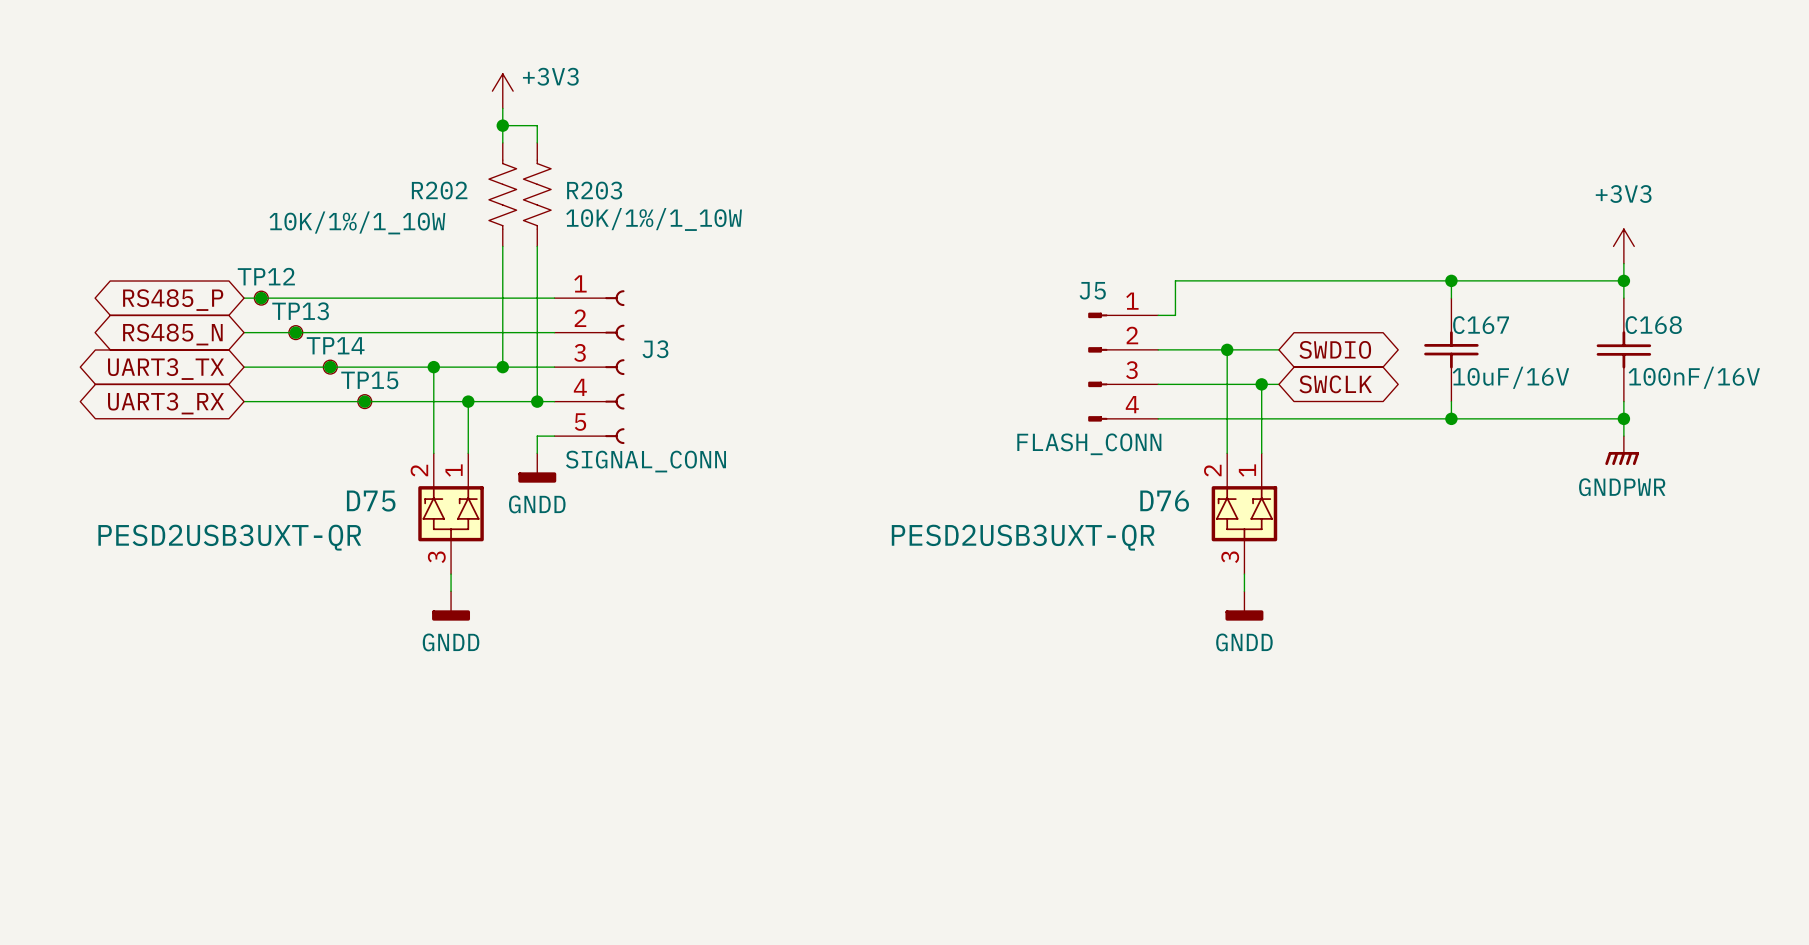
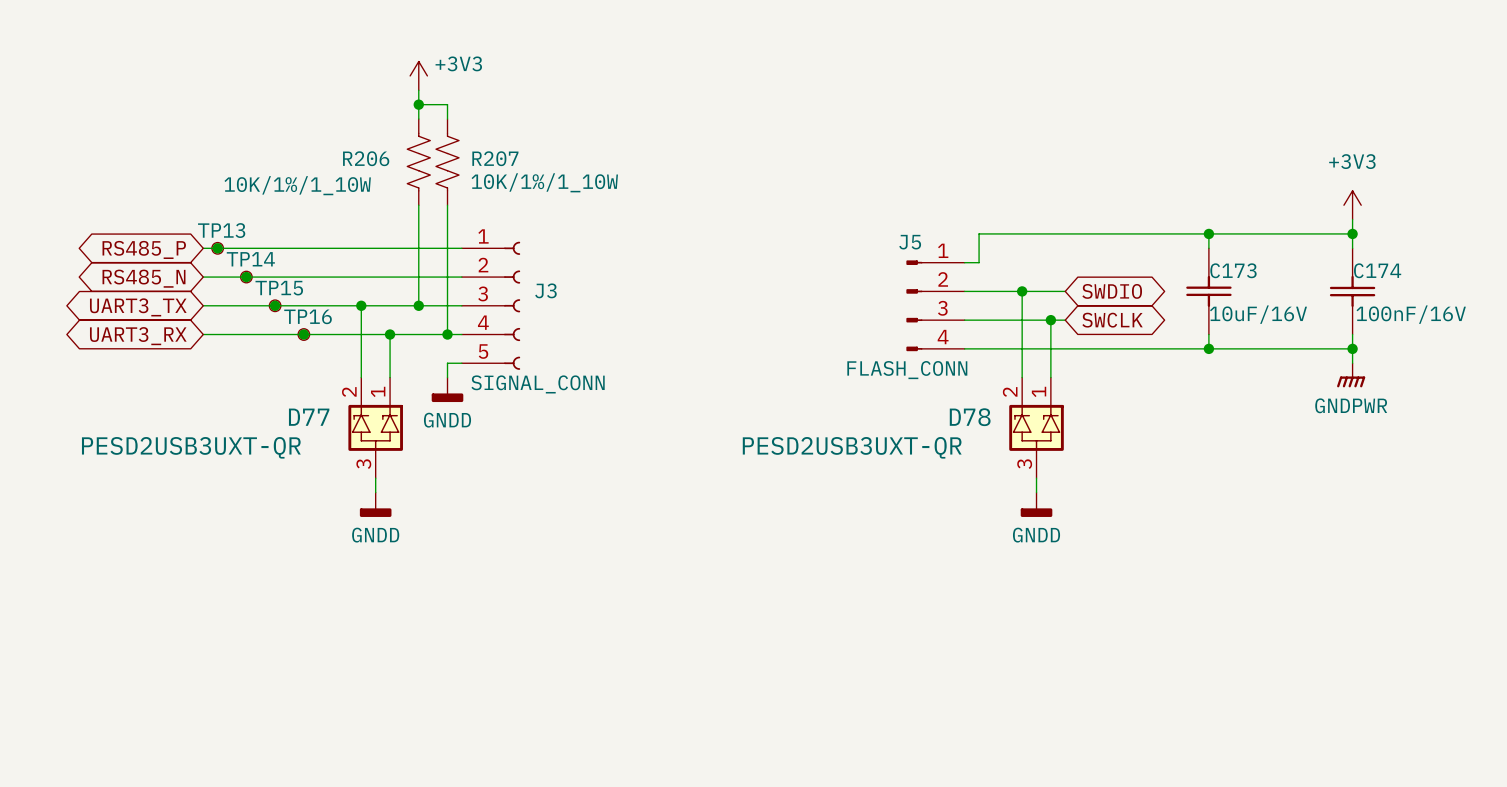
R202 name: R202 (439, 190) -> R206 (366, 158)
R203 name: R203 (594, 190) -> R207 (495, 158)
TP12 name: TP12 (266, 276) -> TP13 (221, 230)
TP13 name: TP13 (300, 311) -> TP14 (250, 259)
C167 name: C167 (1481, 325) -> C173 (1233, 270)
C168 name: C168 (1653, 325) -> C174 (1377, 270)
TP14 name: TP14 (335, 345) -> TP15 (279, 288)
TP15 name: TP15 (369, 380) -> TP16 (308, 316)
D75 name: D75 (371, 501) -> D77 (309, 417)
D76 name: D76 (1164, 501) -> D78 (970, 417)

